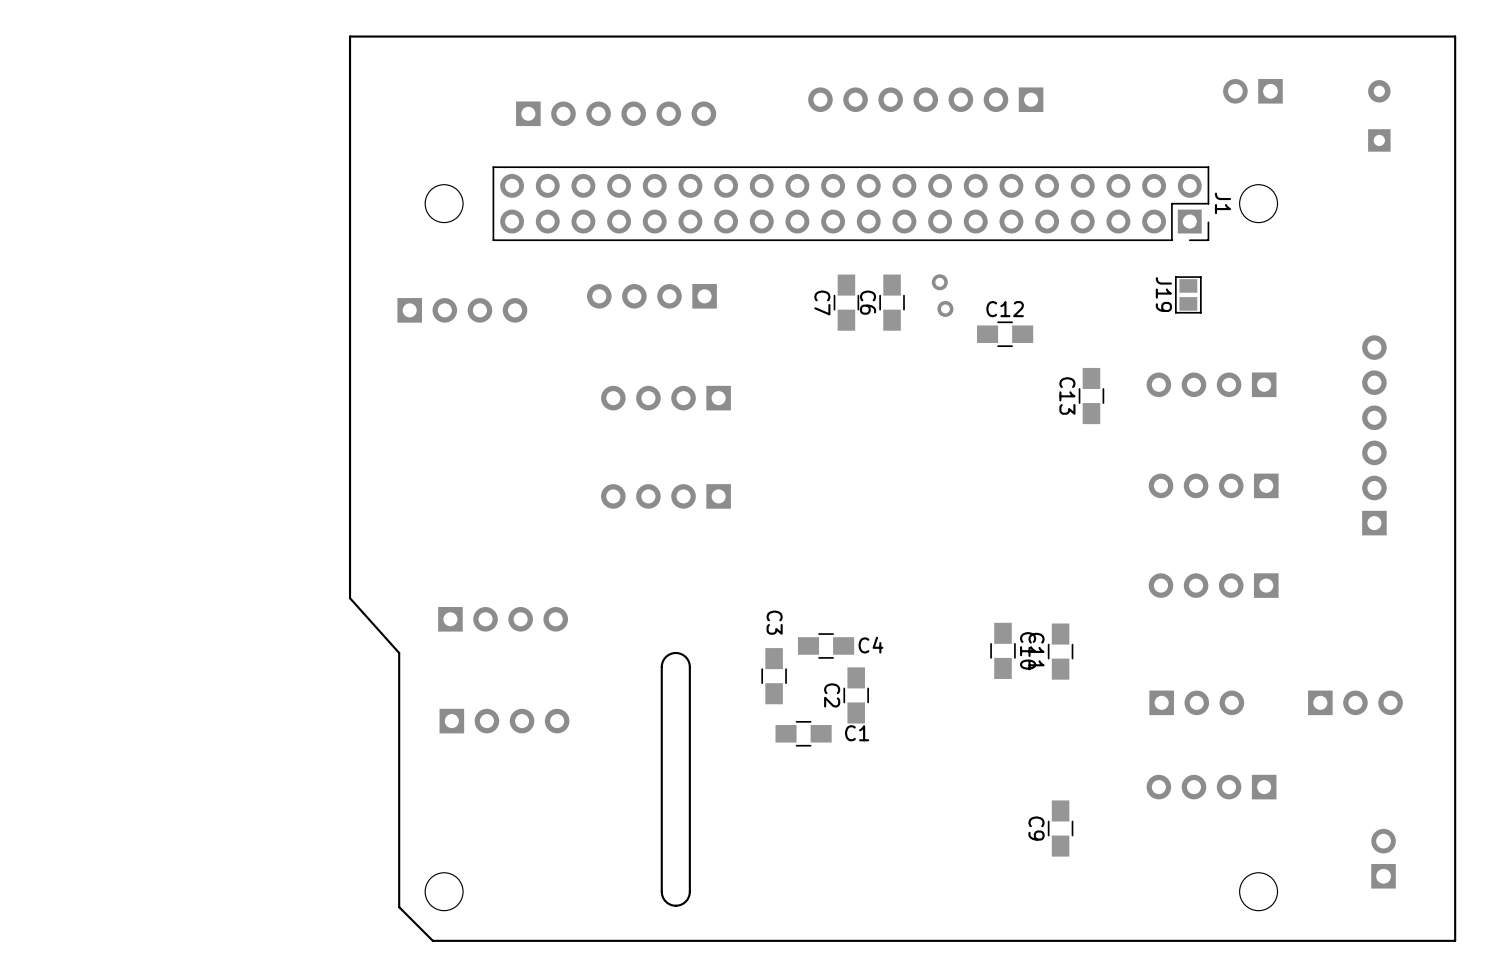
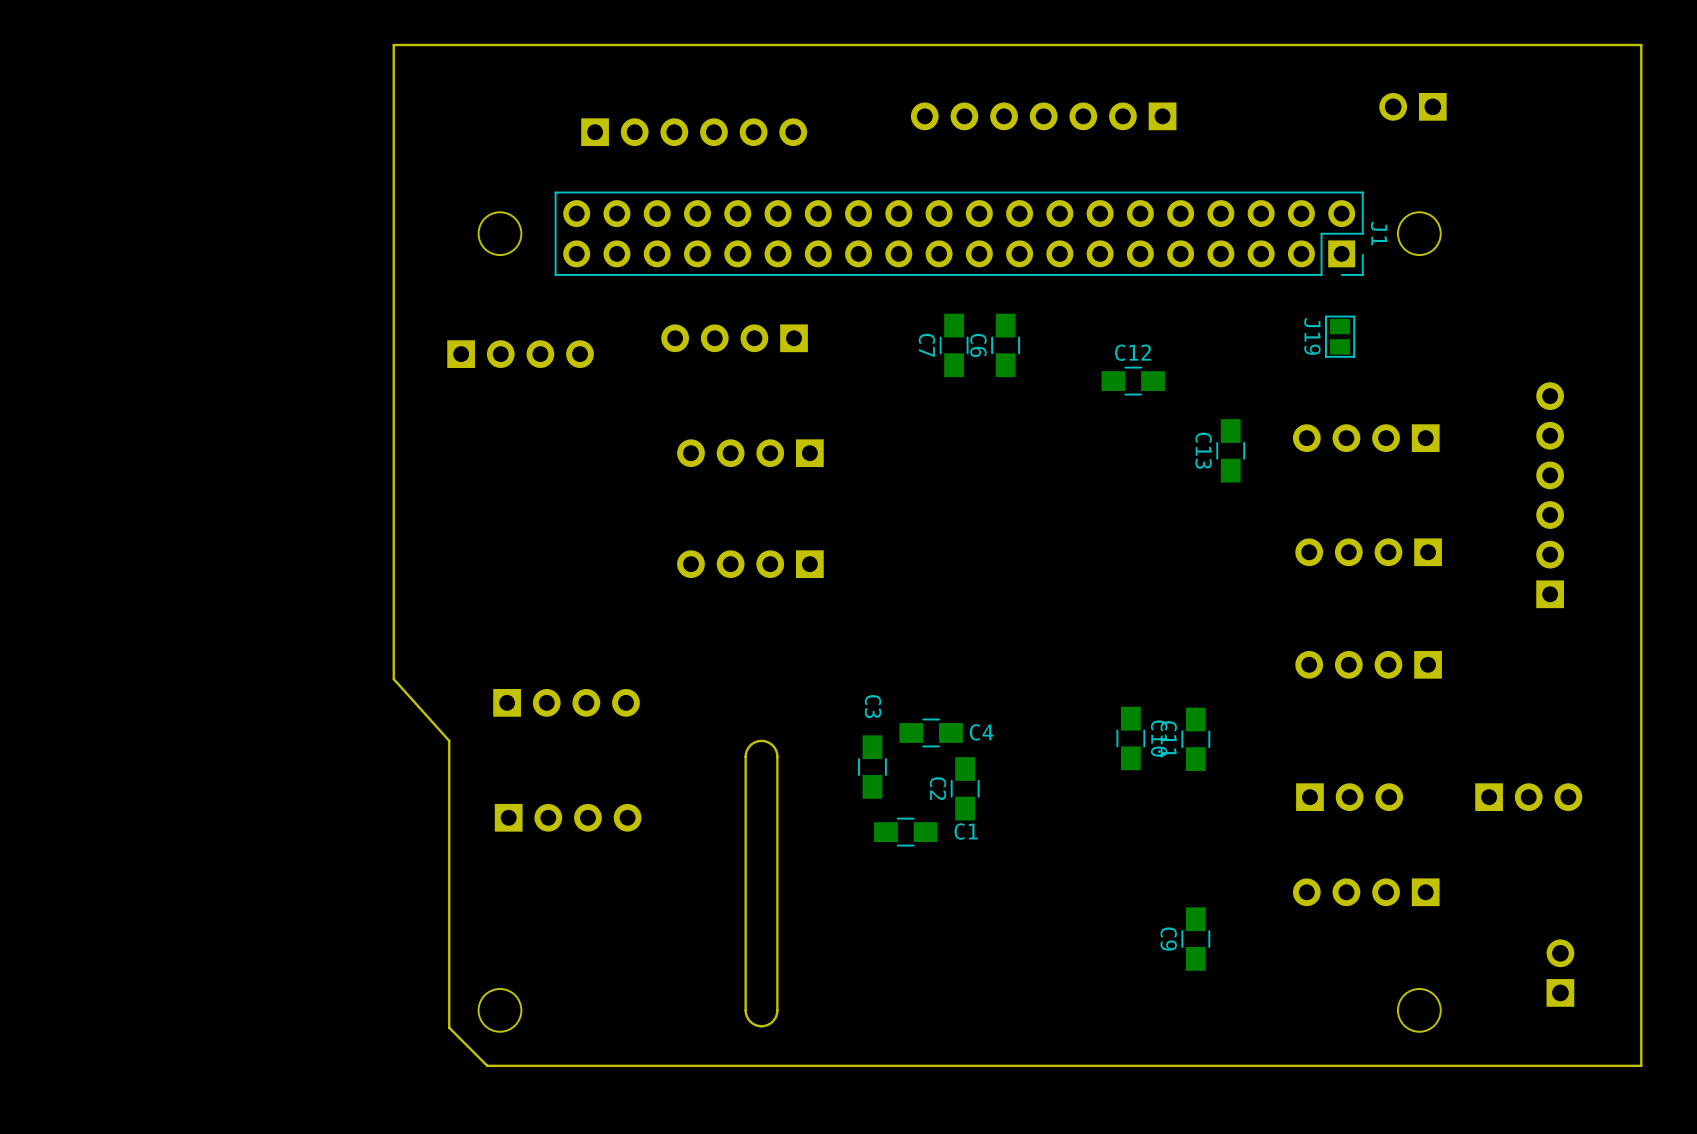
part: (1379, 115) -> none
part: (939, 282) -> none
part: (945, 308) -> none

